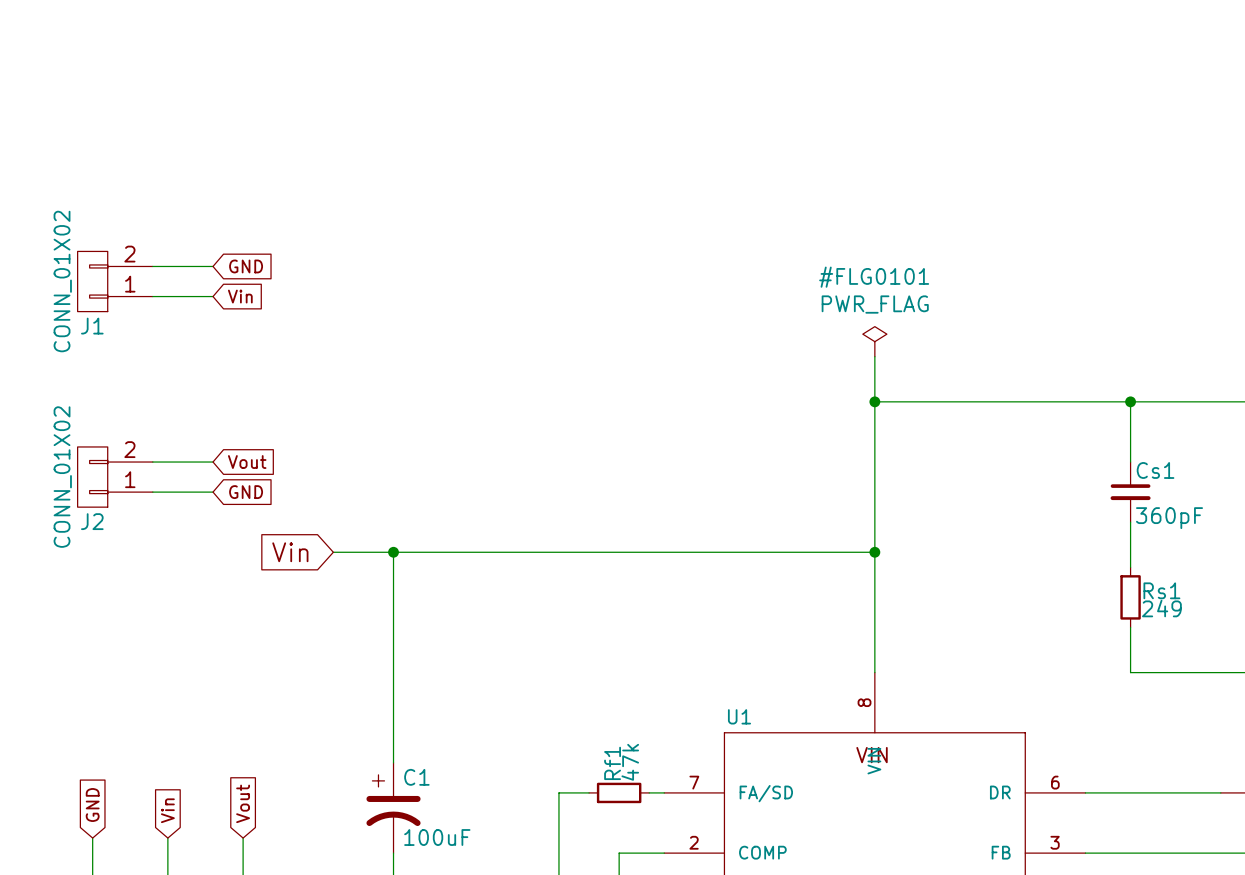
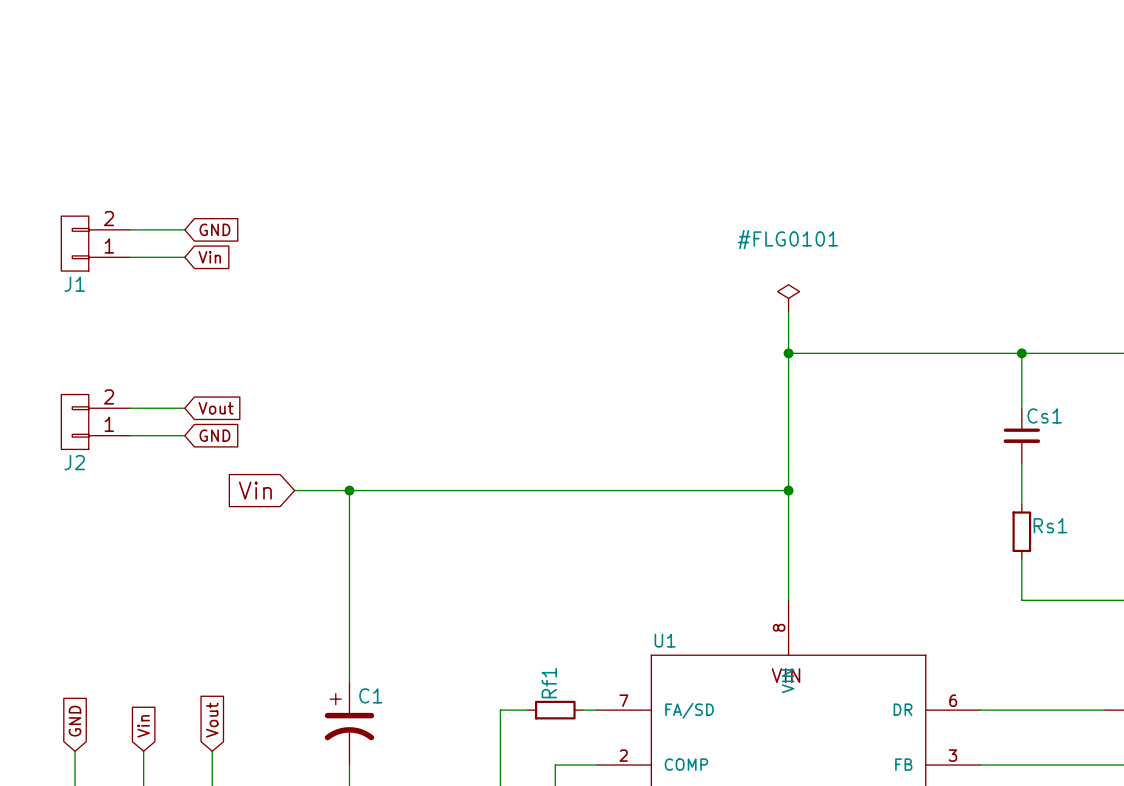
J1 value: CONN_01X02 (62, 281) -> none
#FLG0101 text: PWR_FLAG (875, 304) -> none
J2 value: CONN_01X02 (62, 477) -> none
Cs1 value: 360pF (1169, 518) -> none
Rs1 value: 249 (1161, 608) -> none
Rf1 value: 47k (630, 762) -> none
C1 value: 100uF (437, 837) -> none

